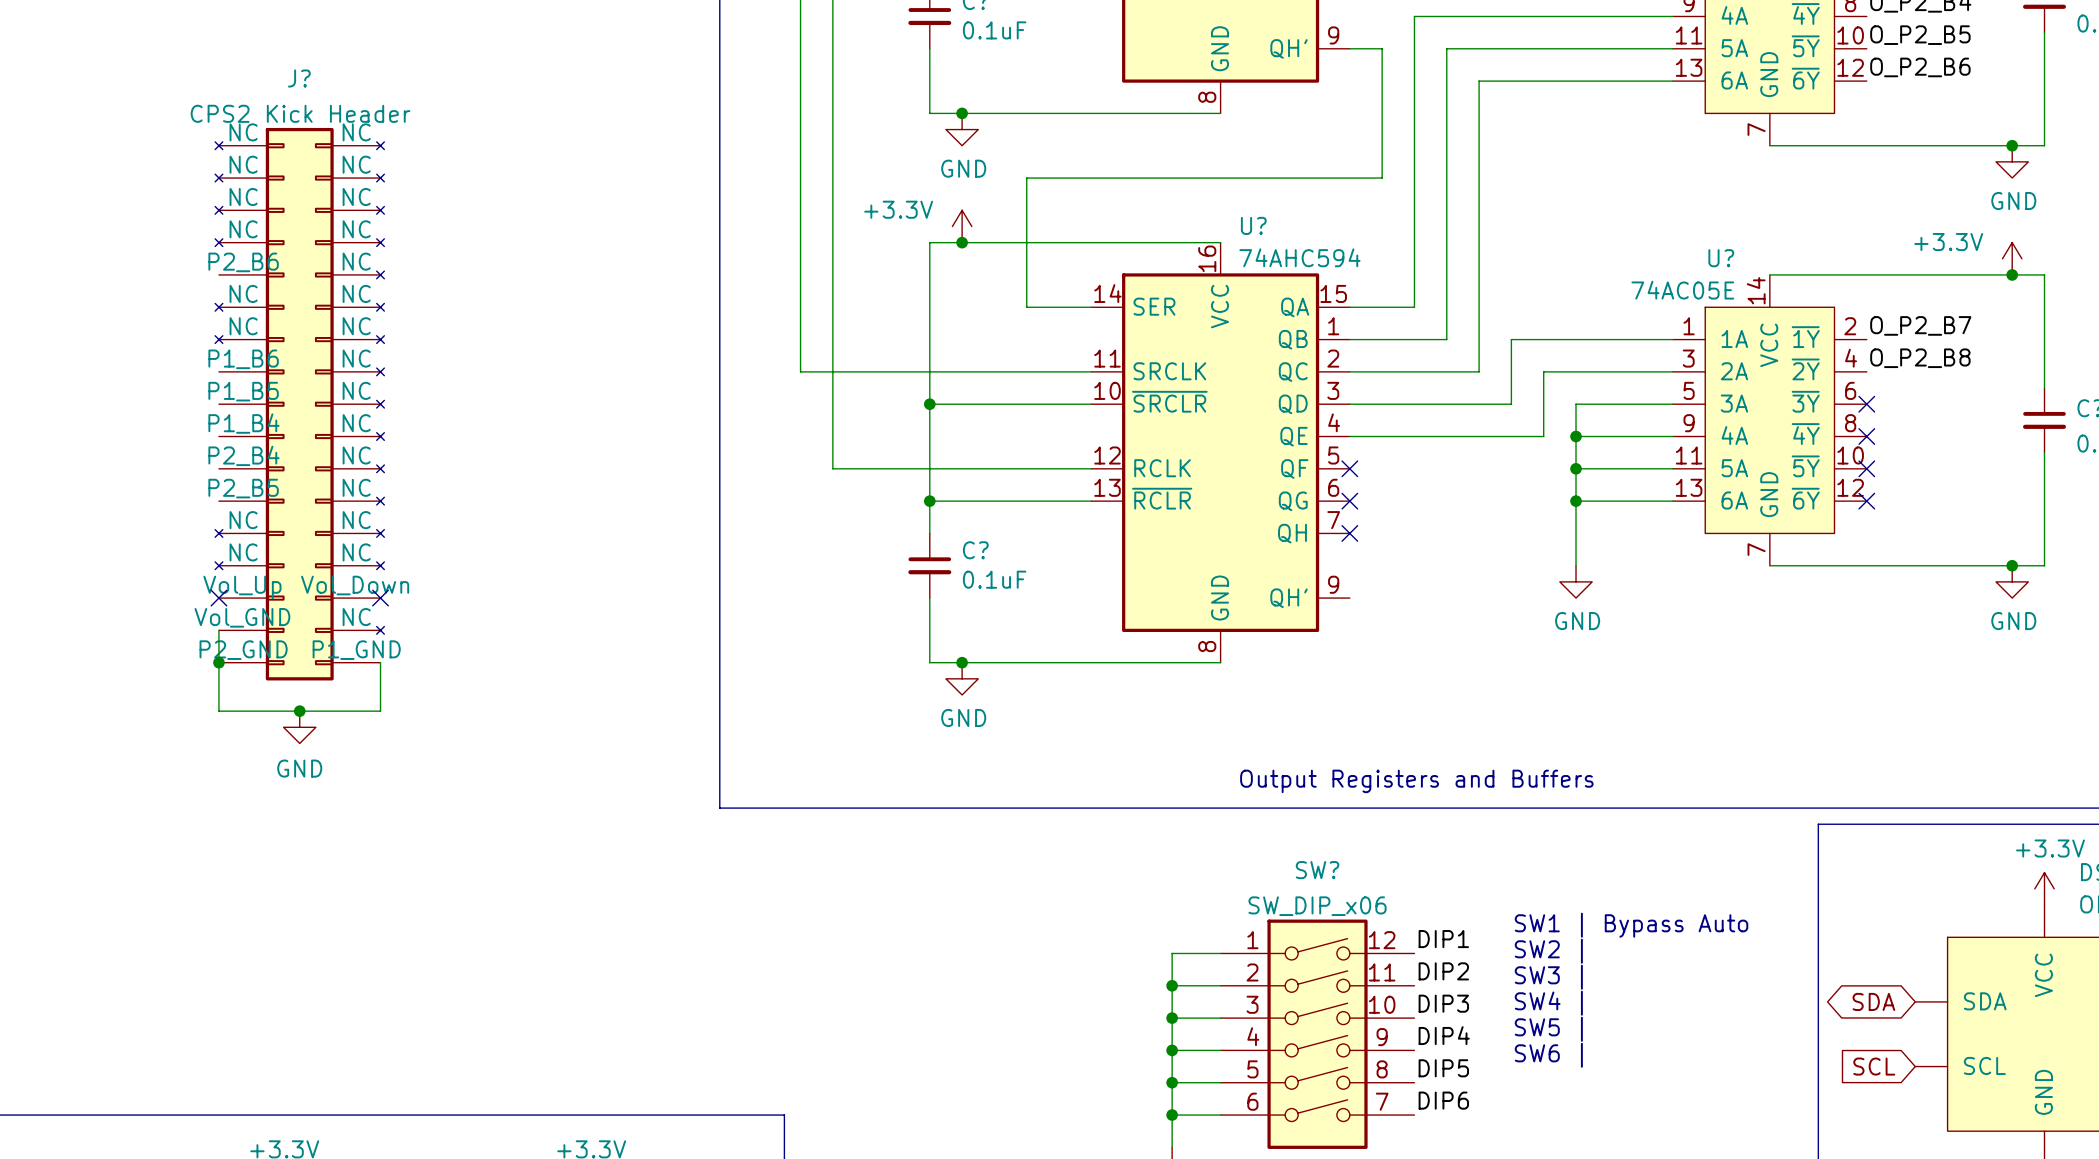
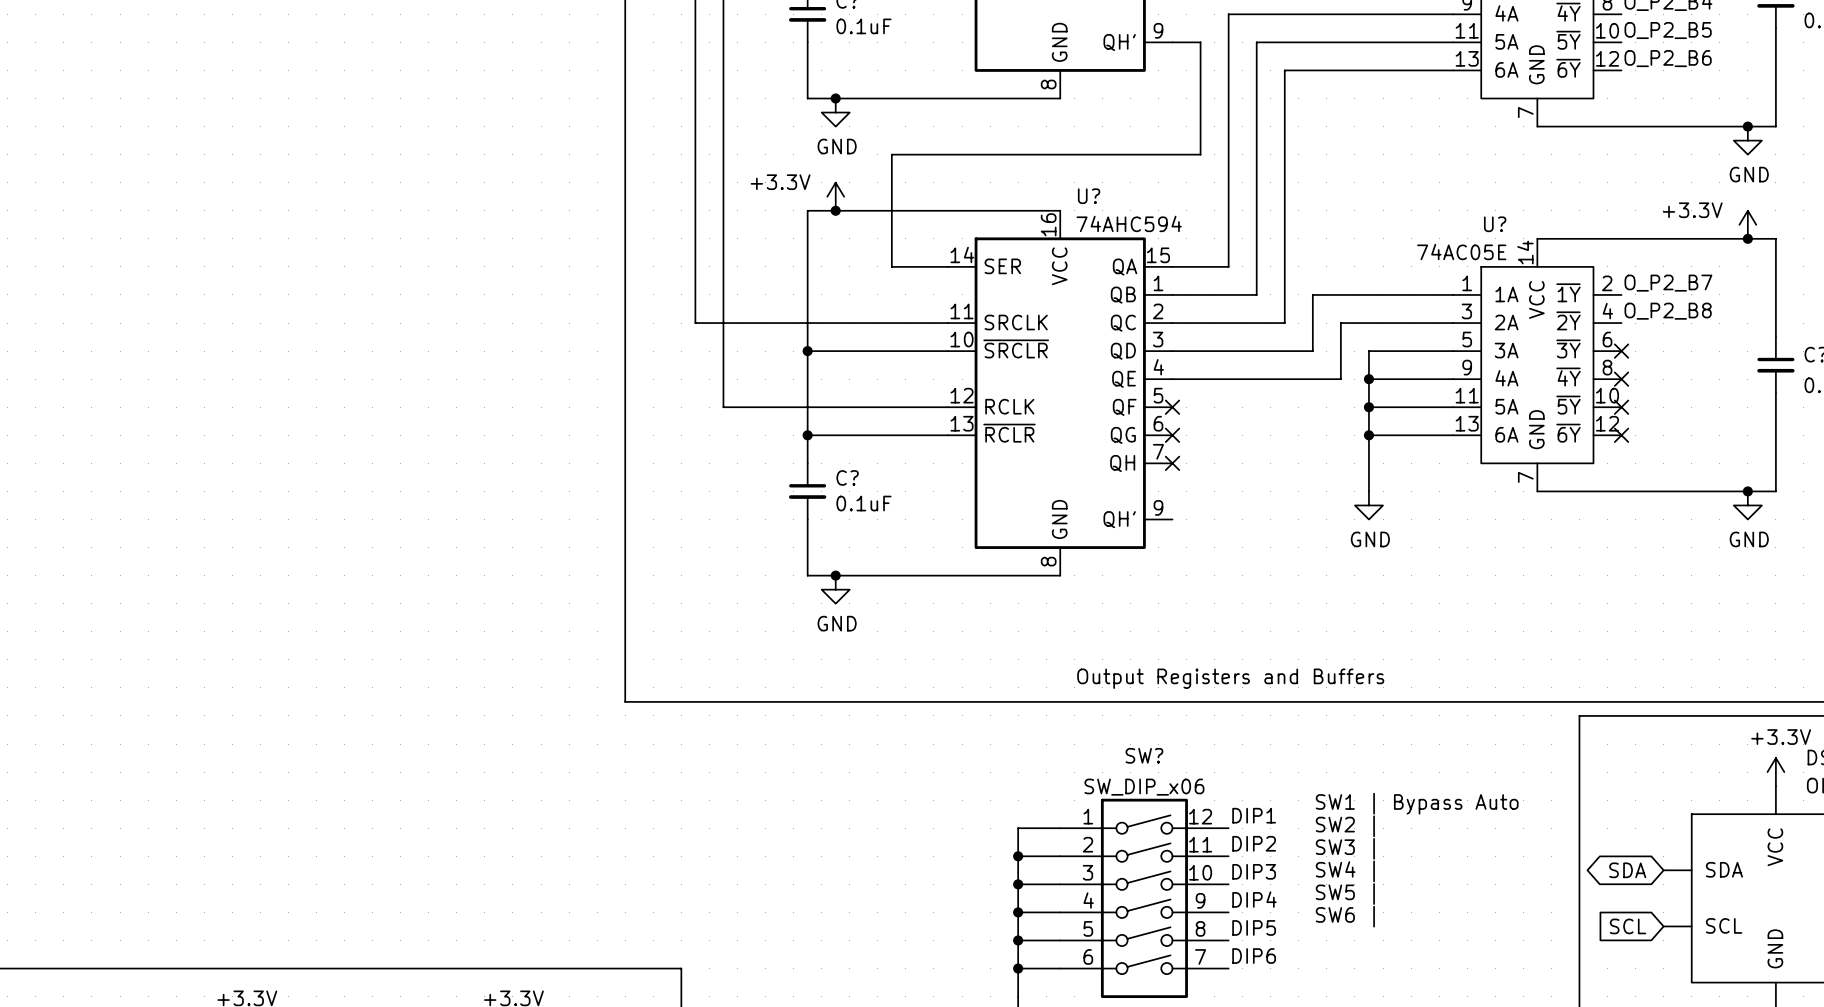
J?: CPS2 Kick Header (299, 404) -> none
no-connect mark: (218, 598) -> none
no-connect mark: (380, 598) -> none
wire: (218, 630) (218, 711) (380, 711) (380, 662) -> none
junction: (218, 662) -> none
junction: (299, 711) -> none
power symbol: GND (299, 727) -> none

